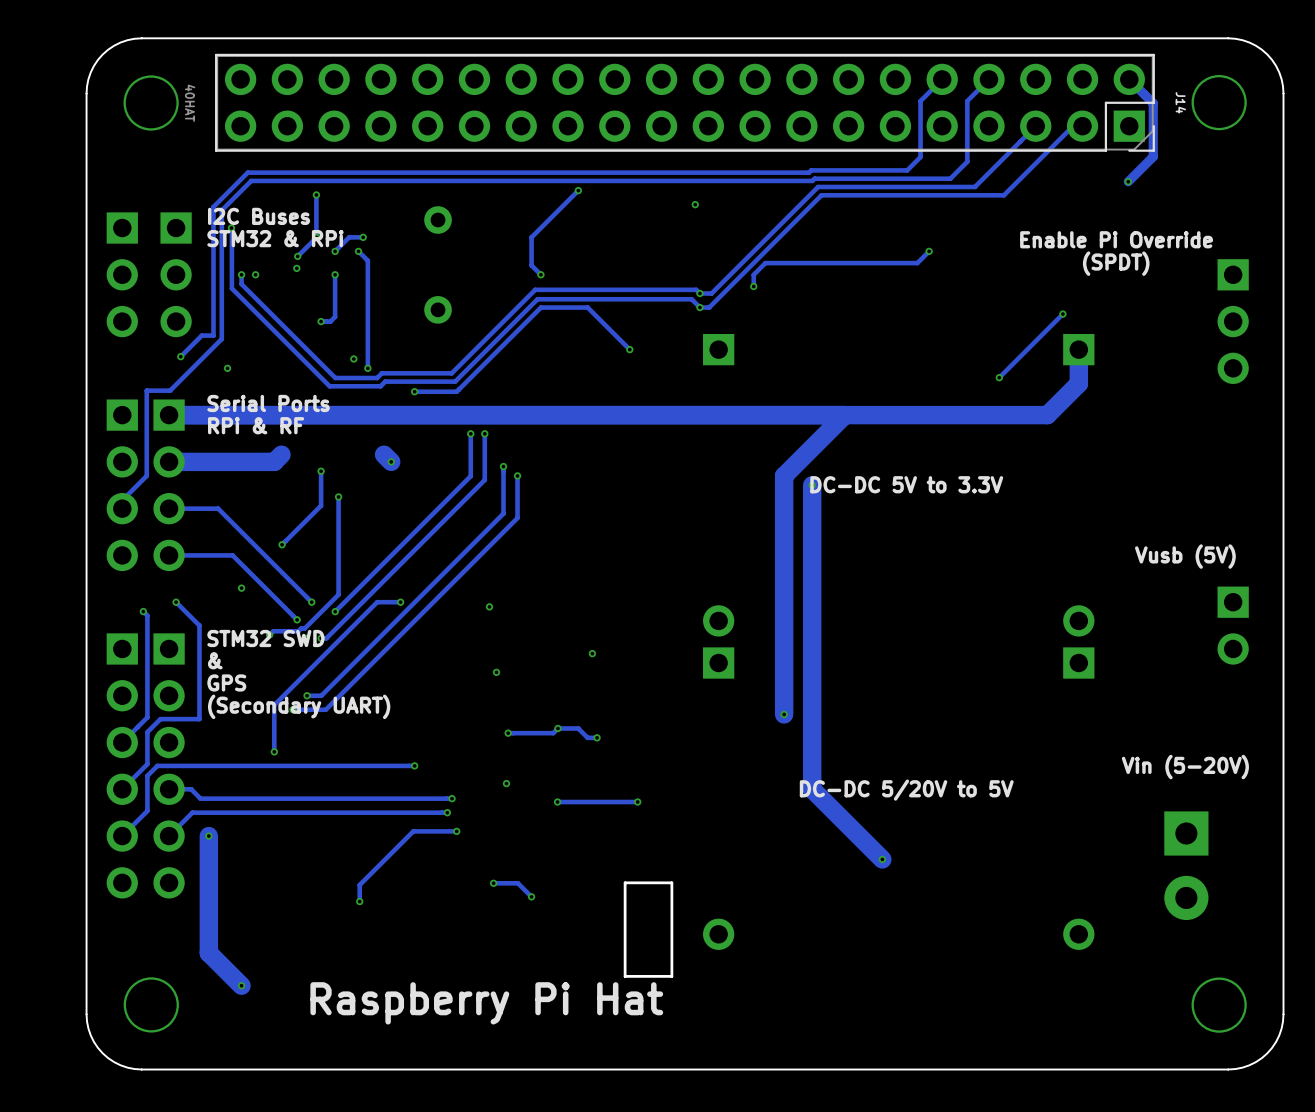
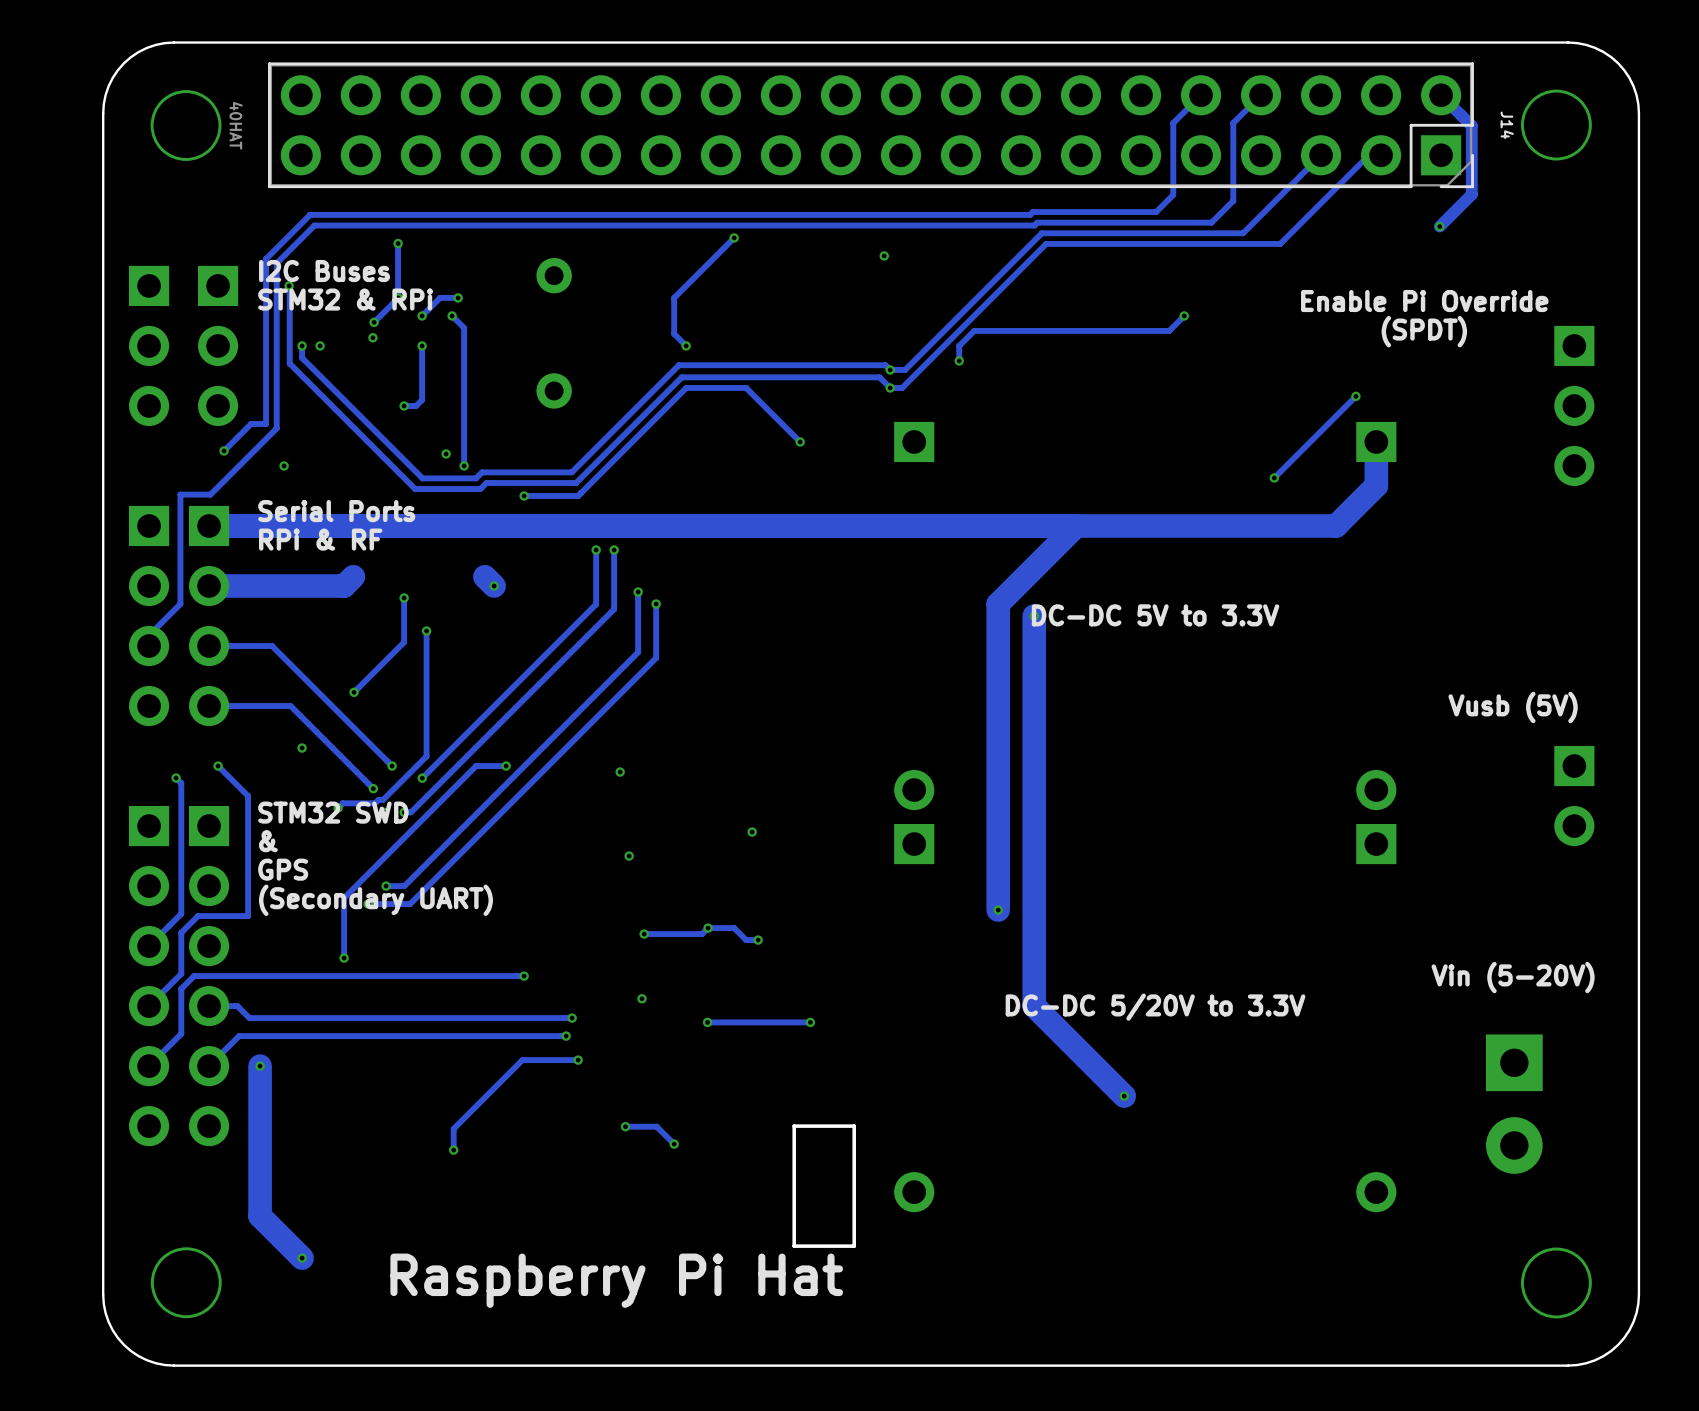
text: DC-DC 5/20V to 5V (906, 790) -> DC-DC 5/20V to 3.3V (1155, 1007)

